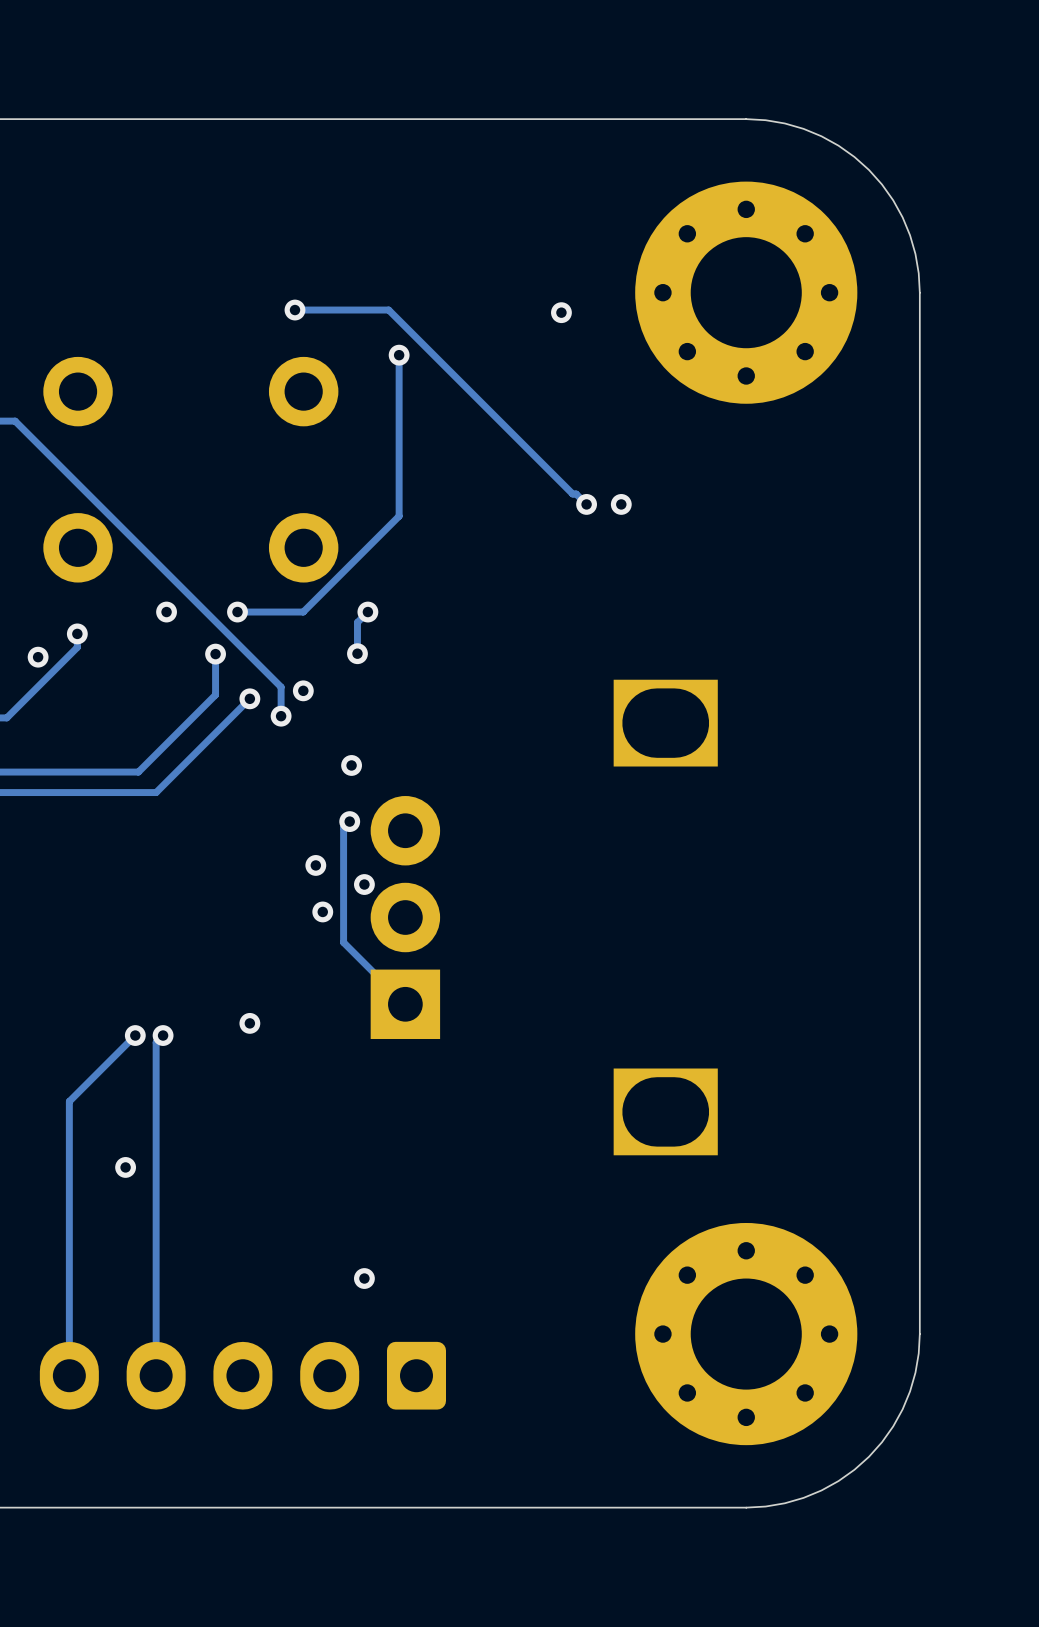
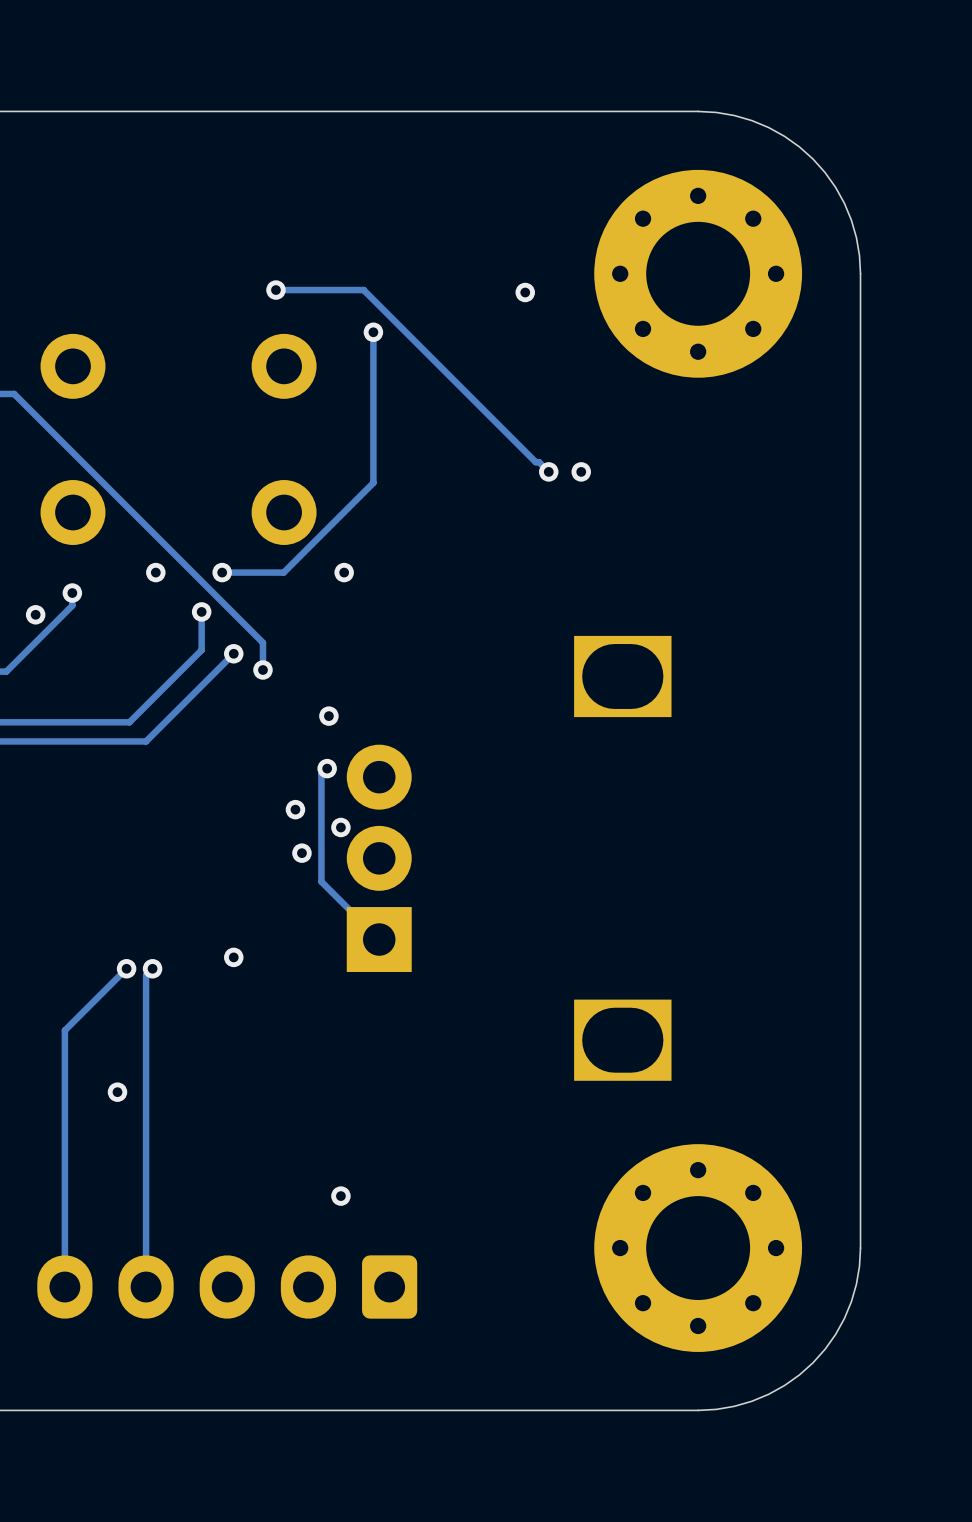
track: (367, 612) (357, 622) (357, 653) -> none
via: (357, 653) -> none
via: (303, 690) -> none

